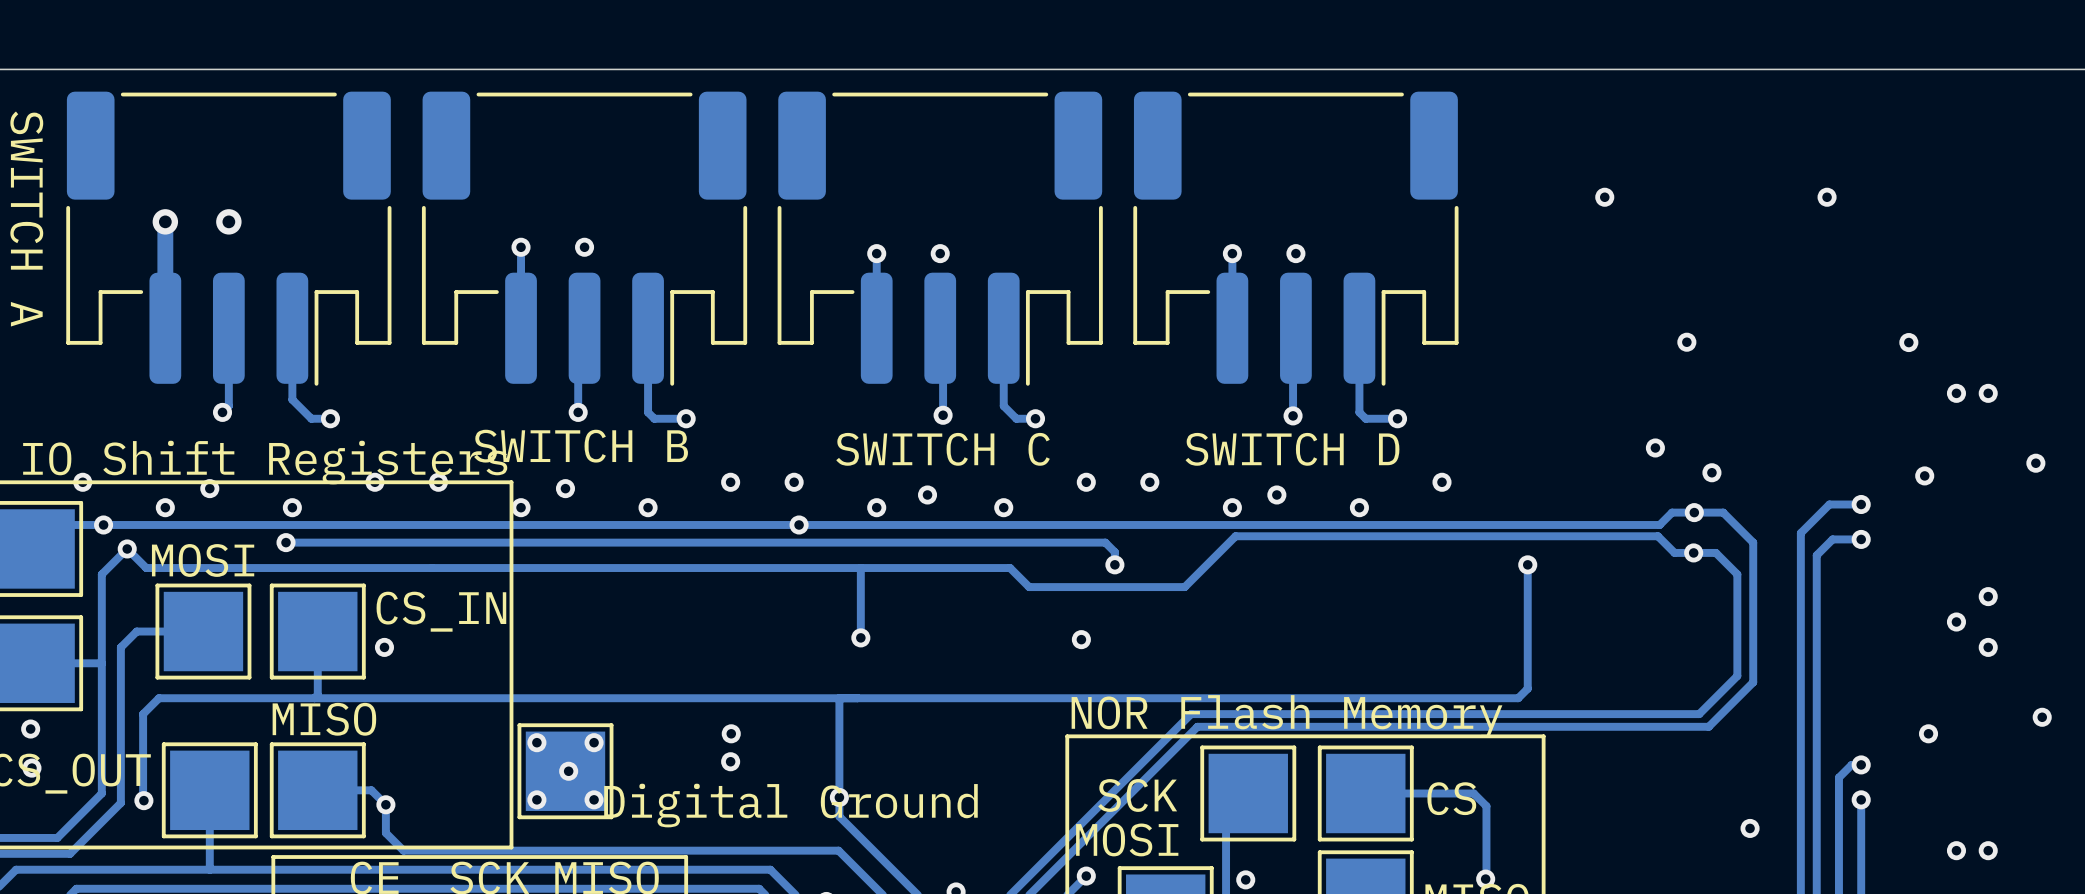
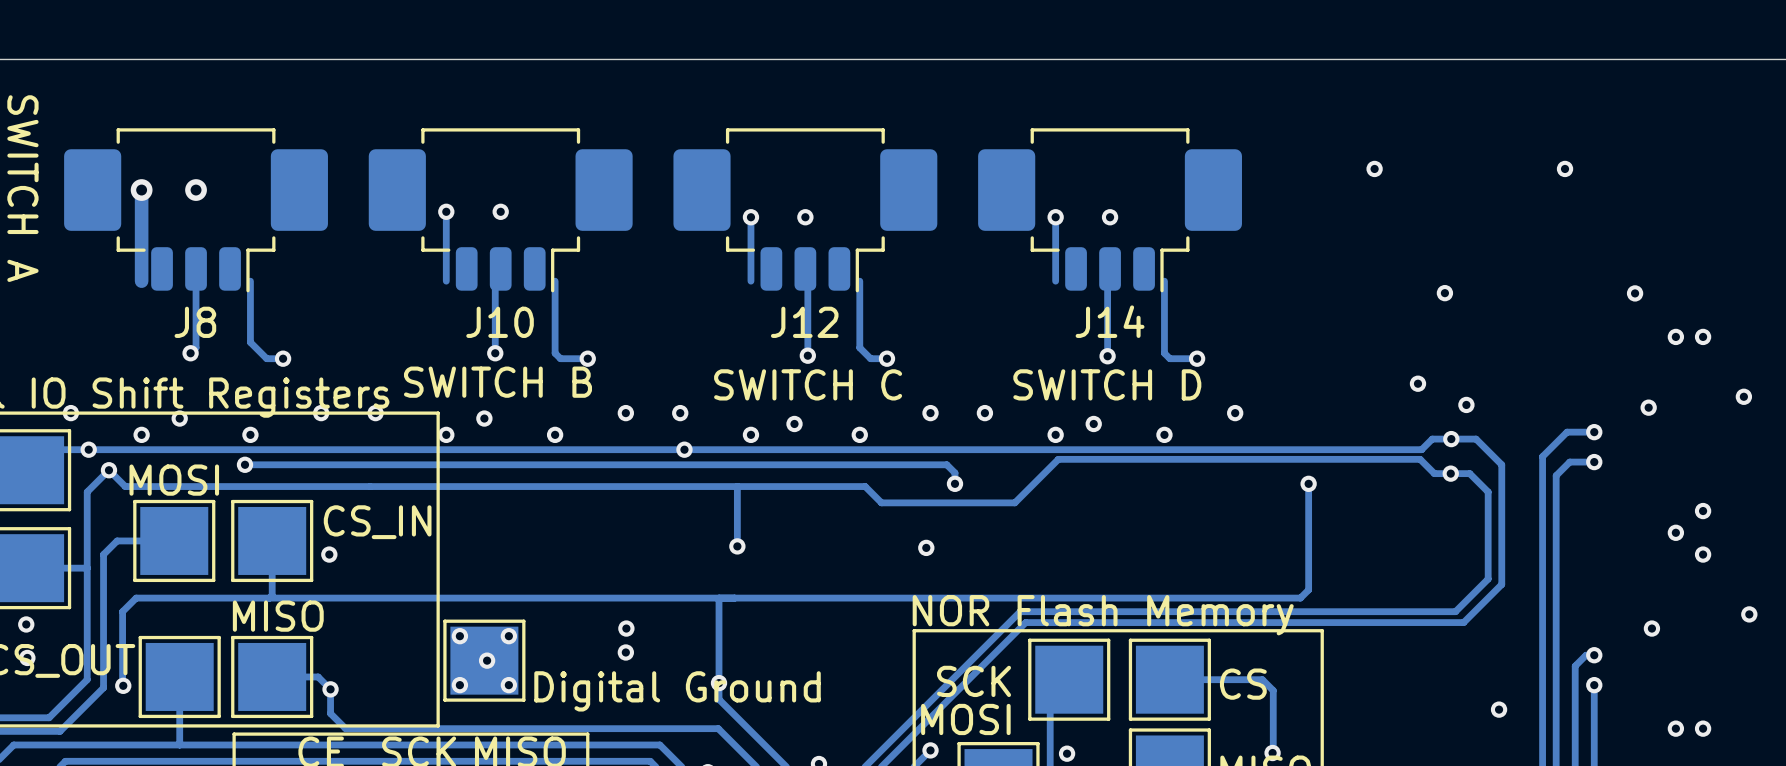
part: (228, 238) -> none
part: (584, 238) -> none
part: (940, 238) -> none
part: (1295, 238) -> none
J8: none -> (196, 210)
J10: none -> (500, 210)
J12: none -> (805, 210)
J14: none -> (1110, 210)

